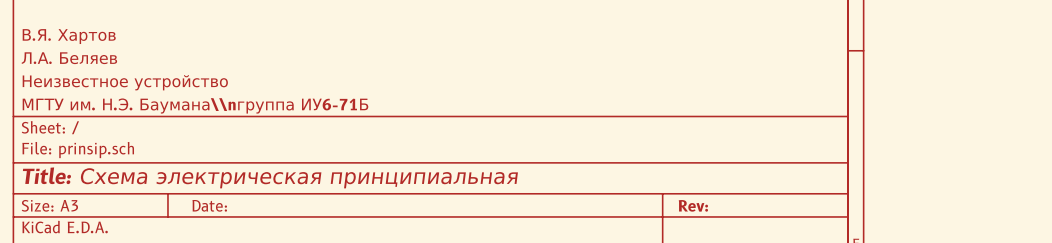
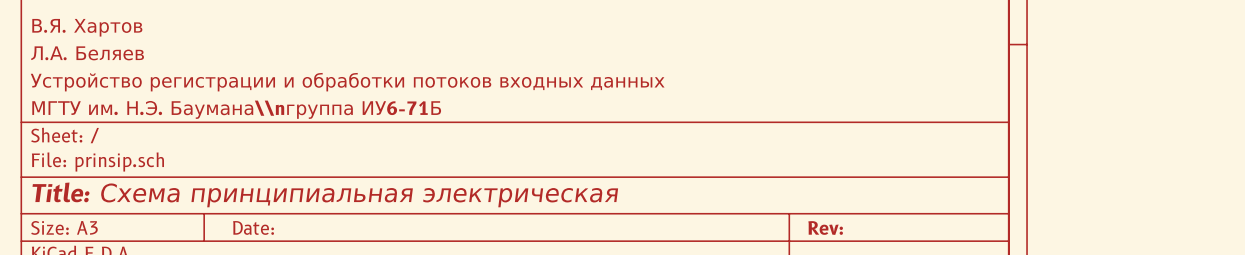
title block: Неизвестное устройство (125, 82) -> Устройство регистрации и обработки потоков входных данных (347, 82)
title block: Title: Схема электрическая принципиальная (270, 177) -> Title: Схема принципиальная электрическая (325, 194)

